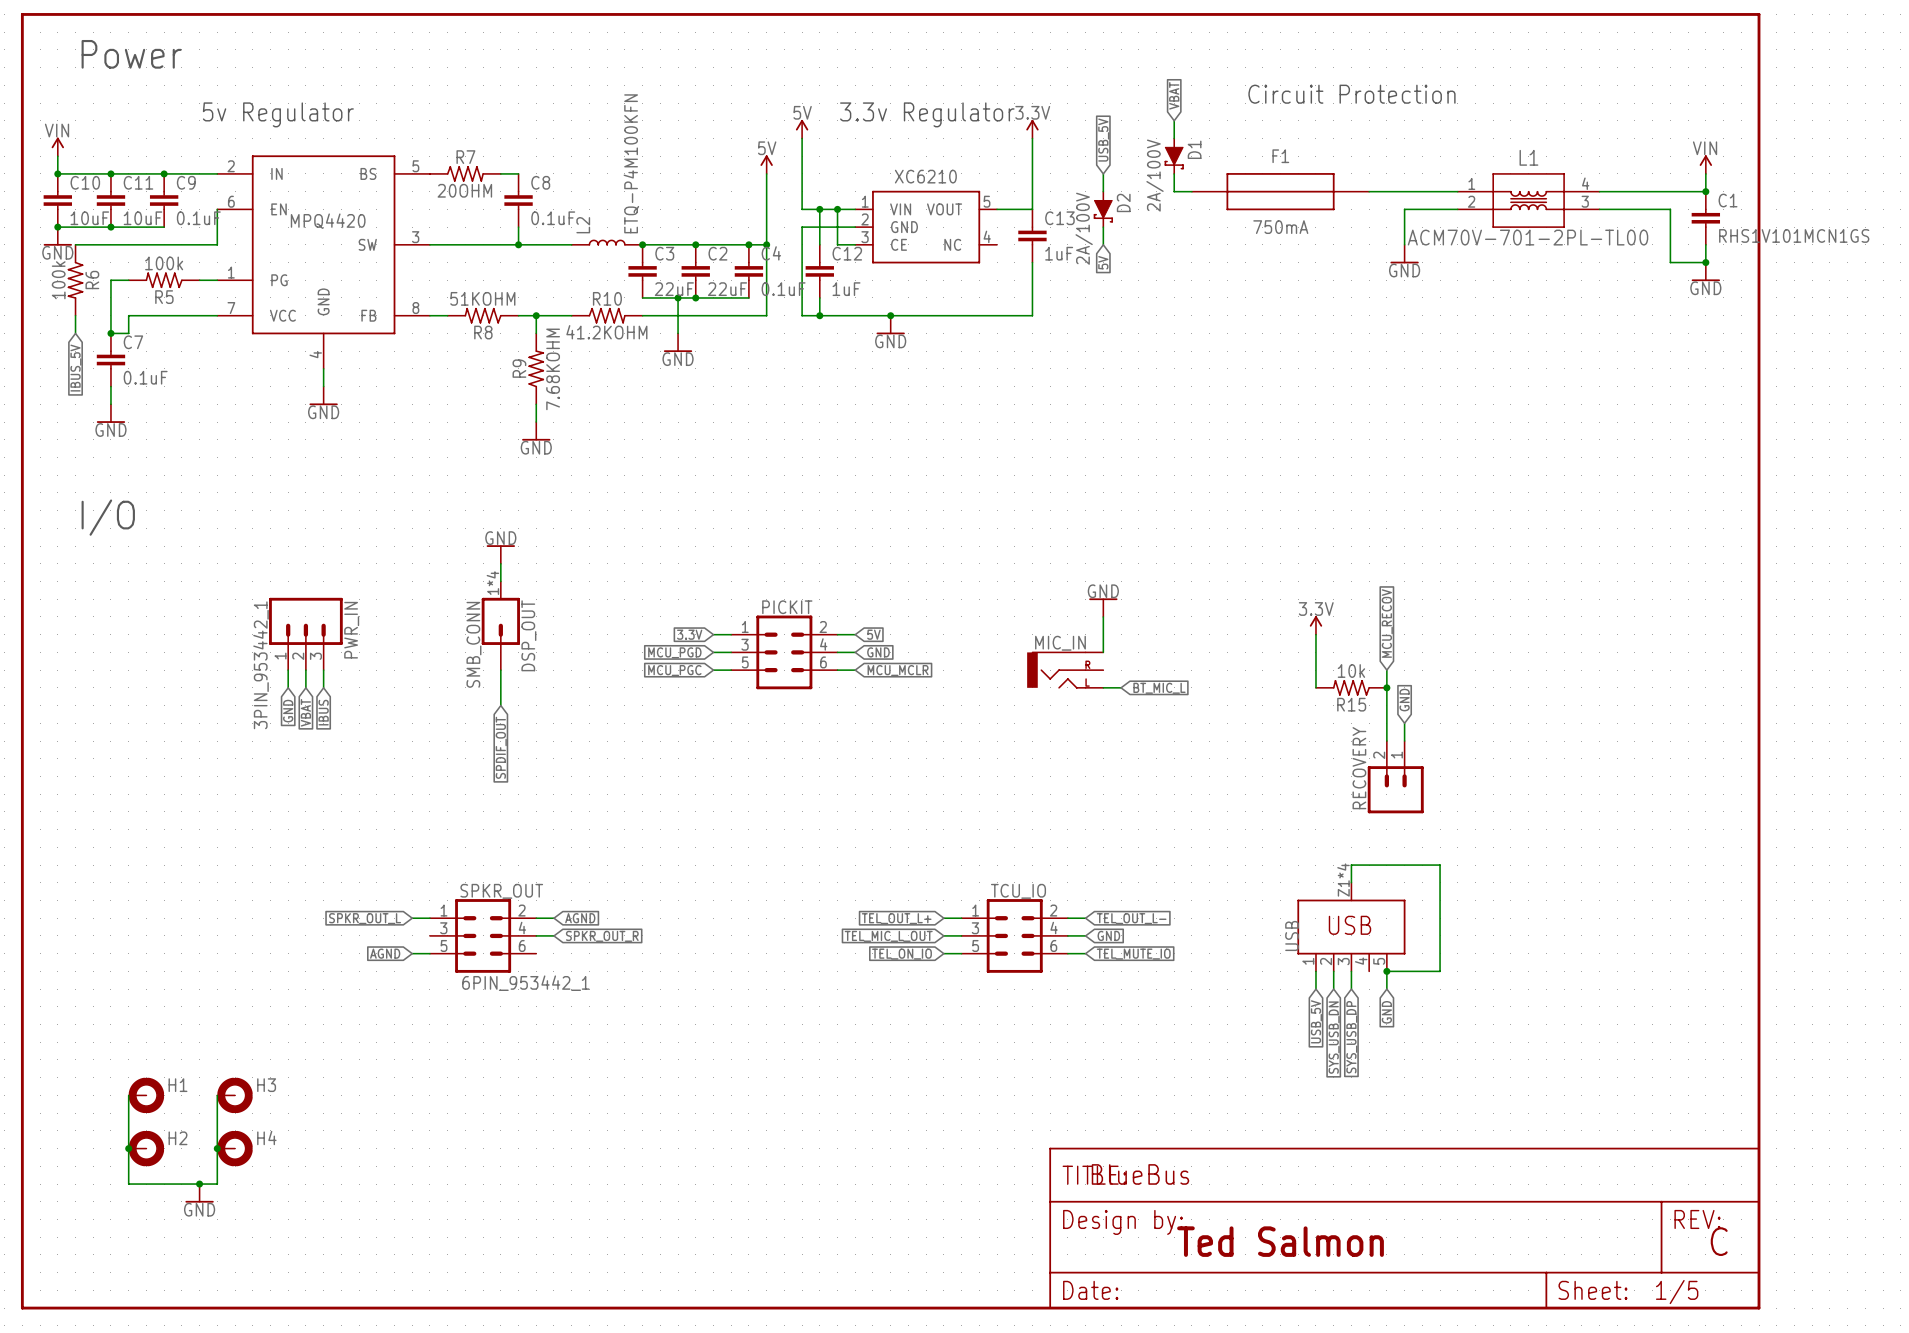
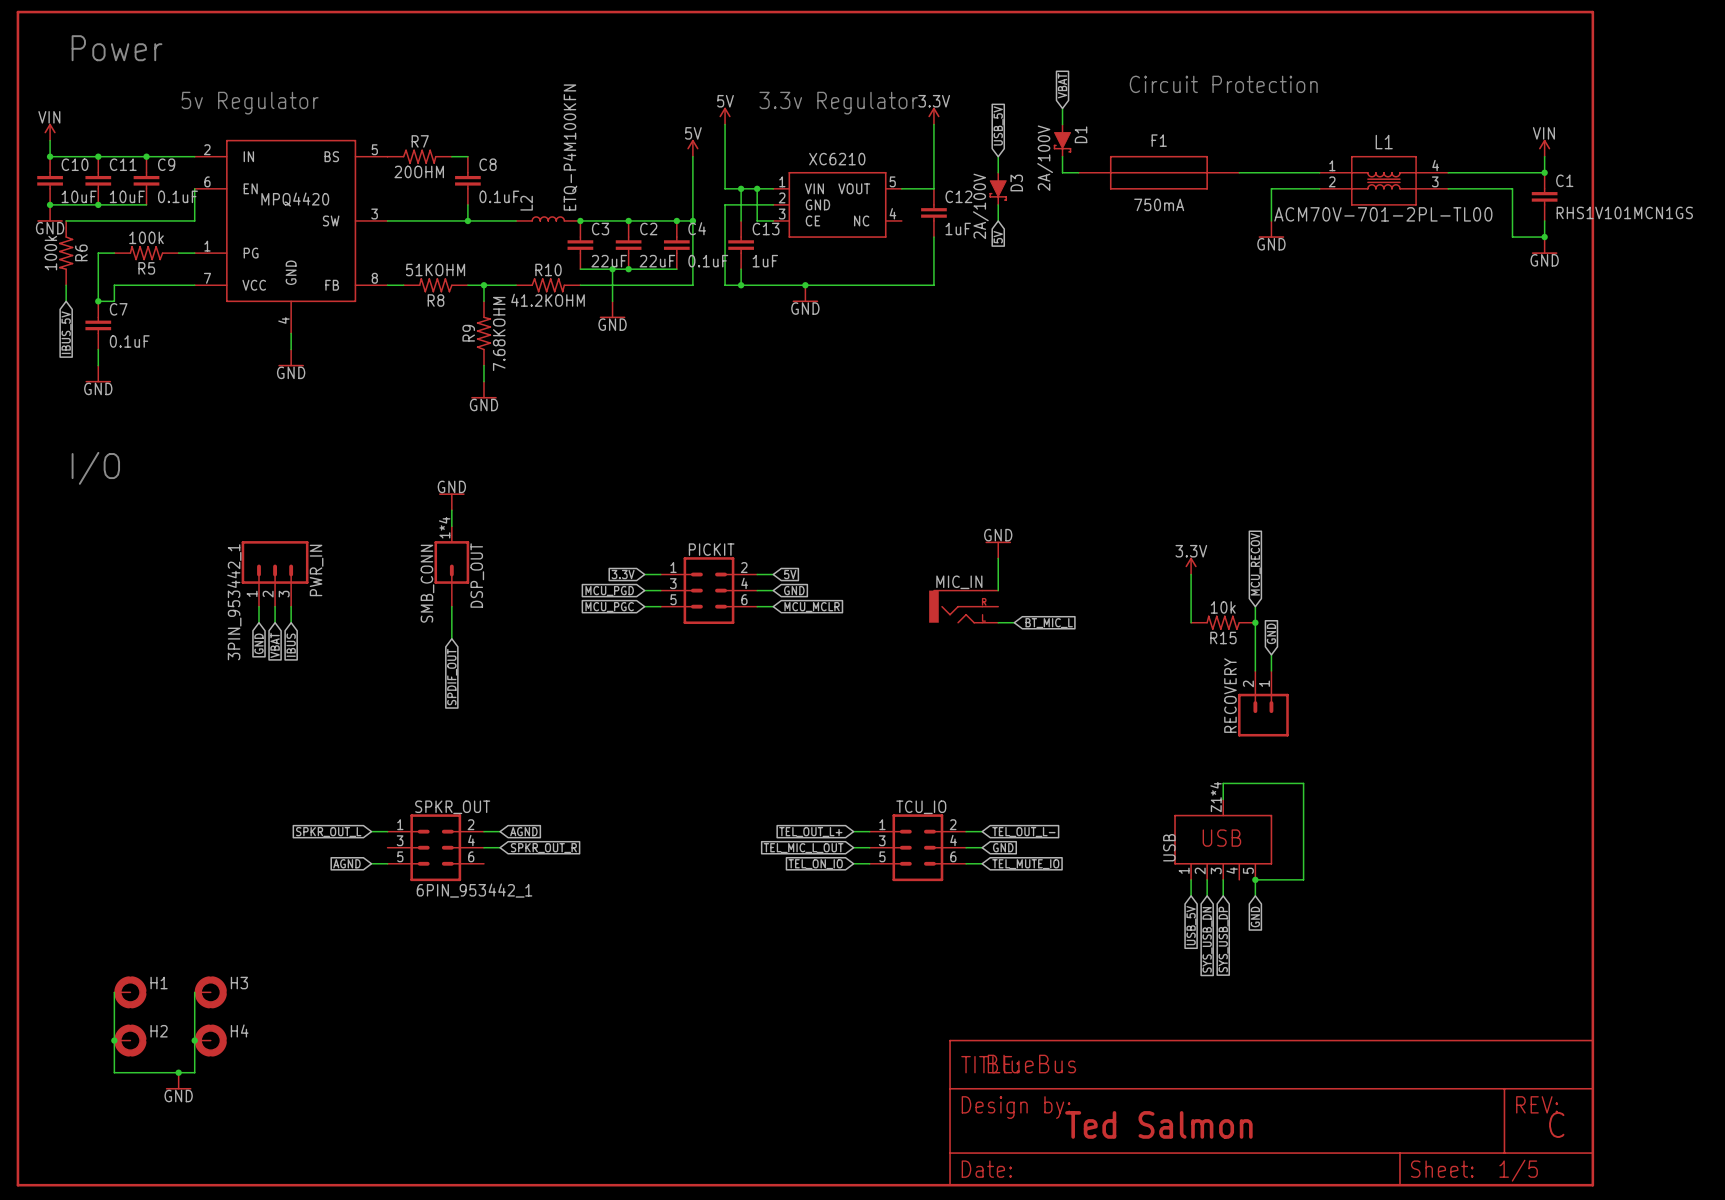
D2 name: D2 (1123, 202) -> D3 (1016, 182)
C13 name: C13 (1059, 218) -> C12 (958, 196)
C12 name: C12 (847, 253) -> C13 (766, 229)

